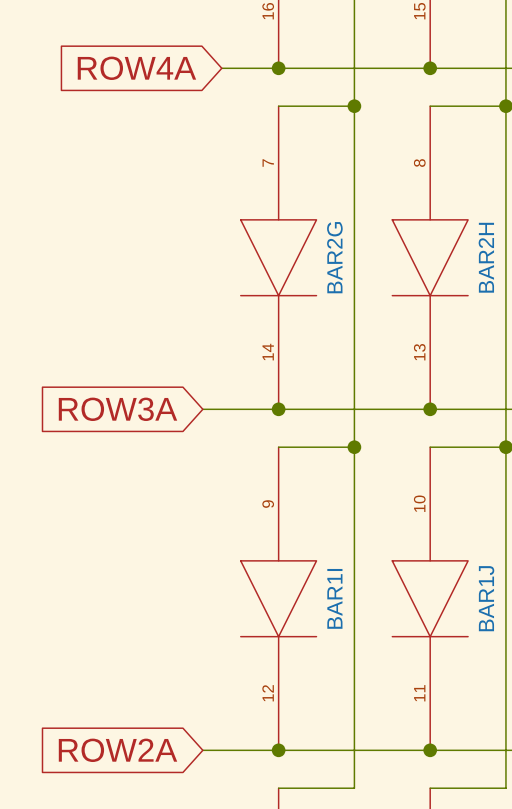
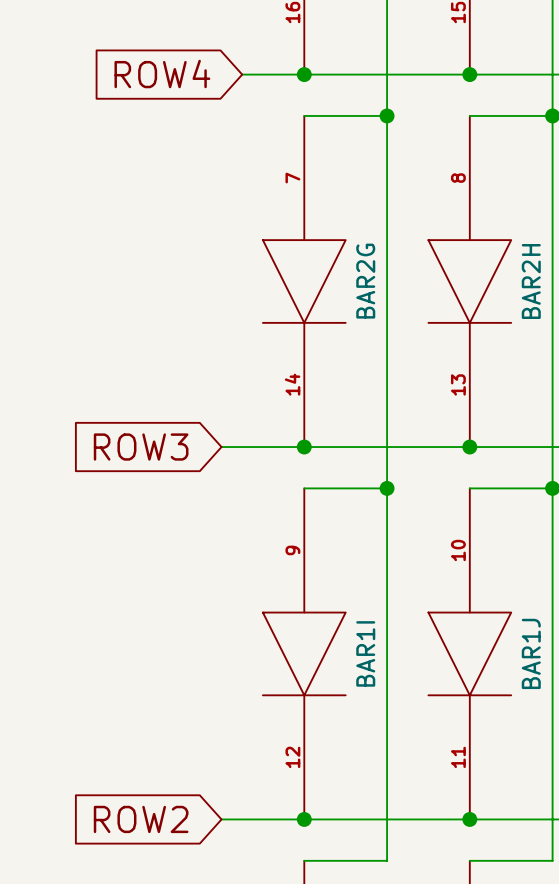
global label: ROW4A (136, 68) -> ROW4 (162, 74)
global label: ROW3A (118, 409) -> ROW3 (141, 447)
global label: ROW2A (118, 750) -> ROW2 (141, 819)

